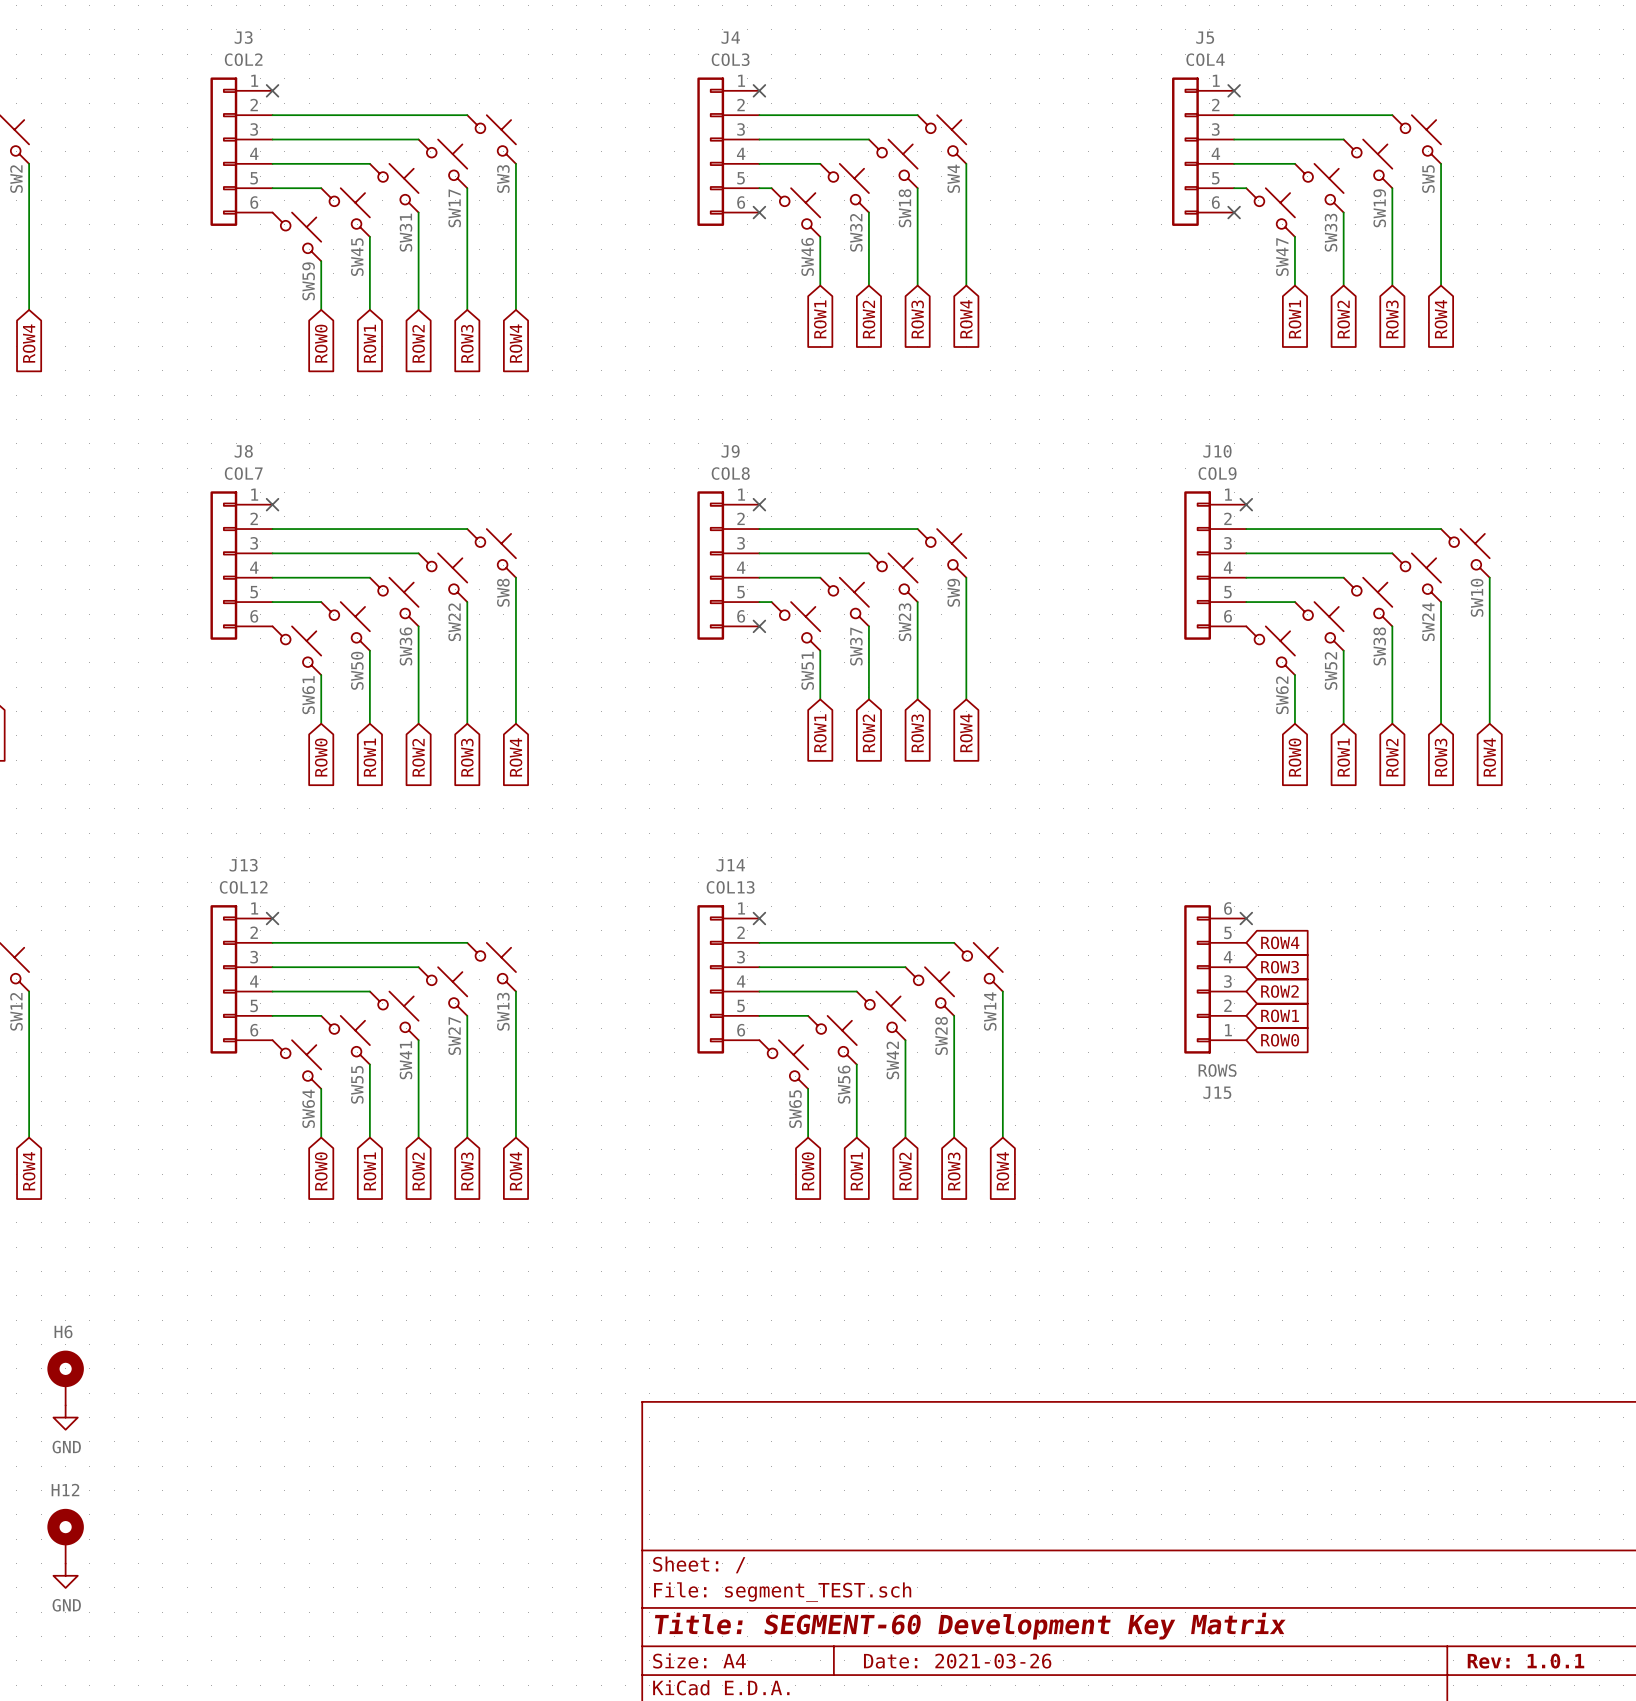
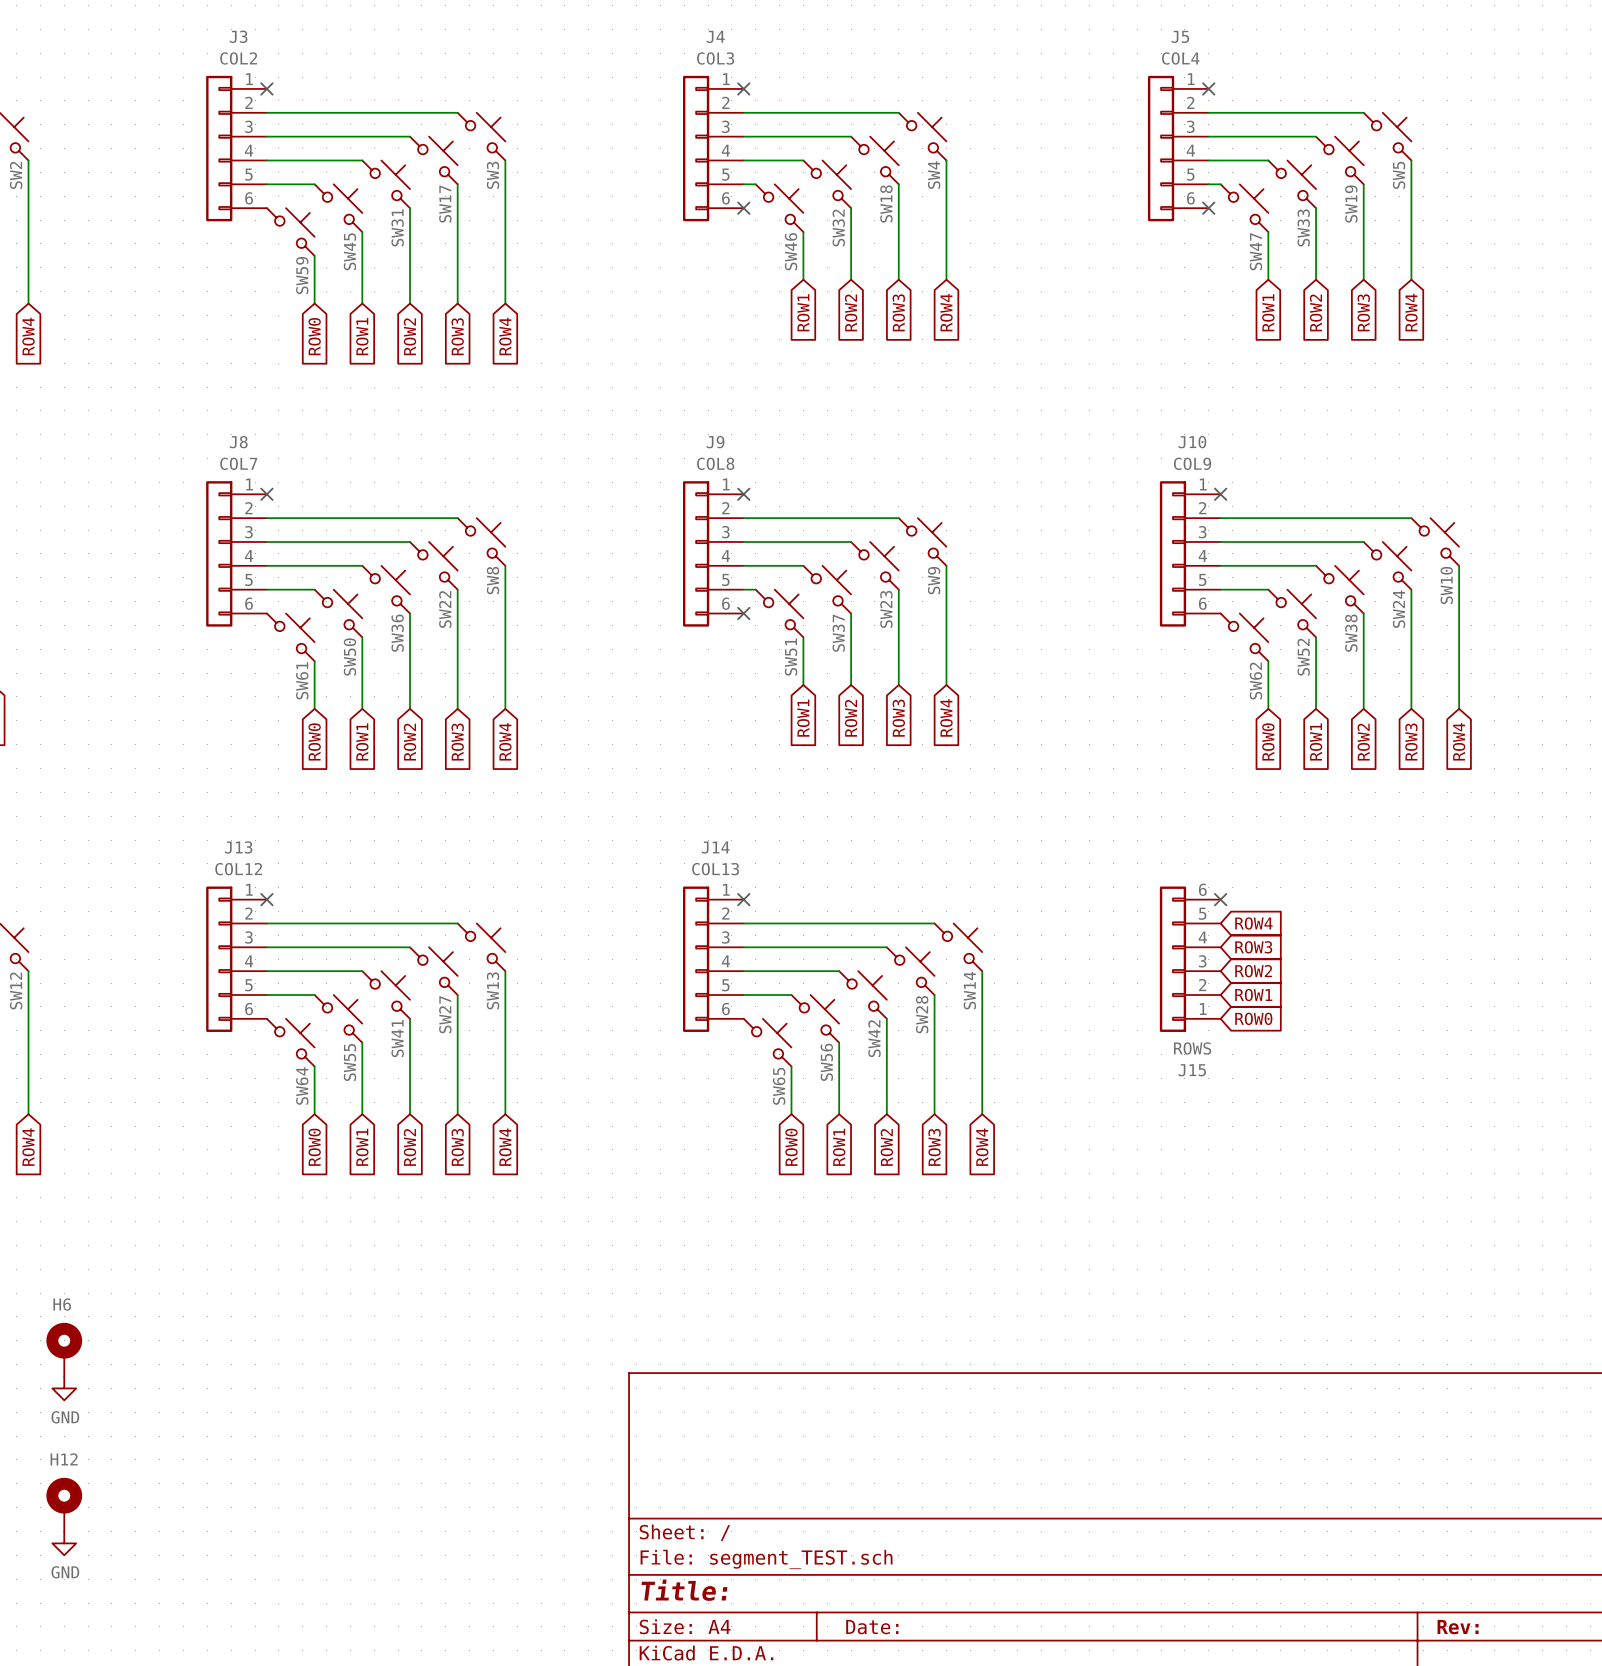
title block: Title: SEGMENT-60 Development Key Matrix (970, 1626) -> Title: (684, 1590)
title block: Date: 2021-03-26 (957, 1661) -> Date: (872, 1627)
title block: Rev: 1.0.1 (1525, 1661) -> Rev: (1458, 1627)

